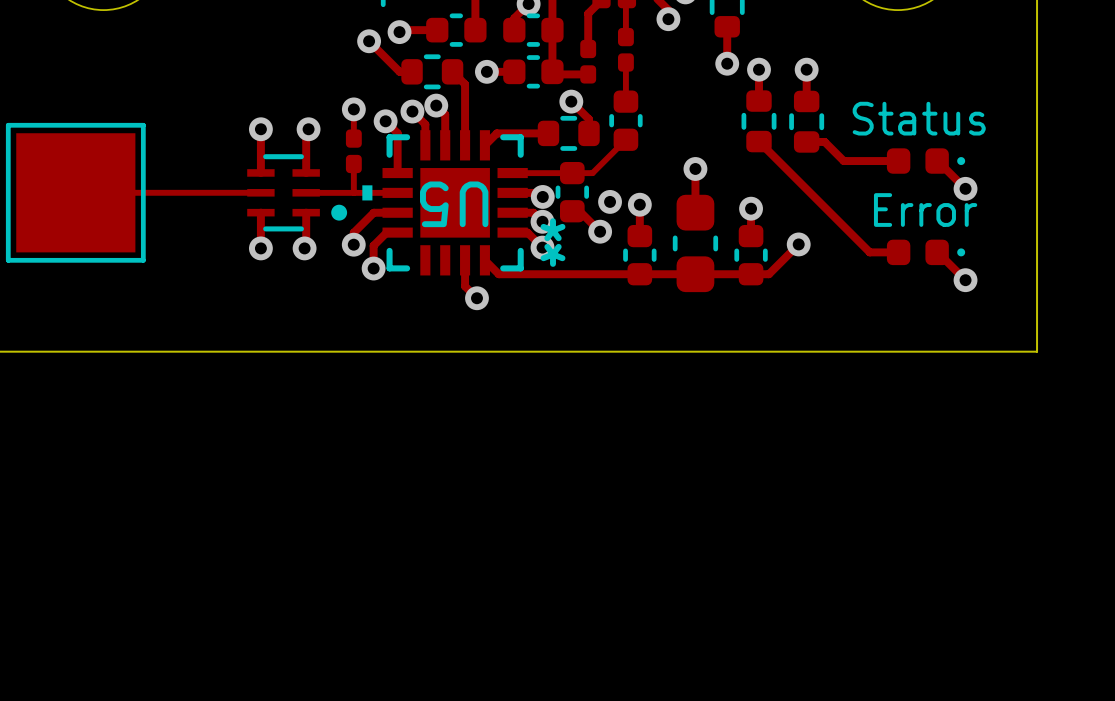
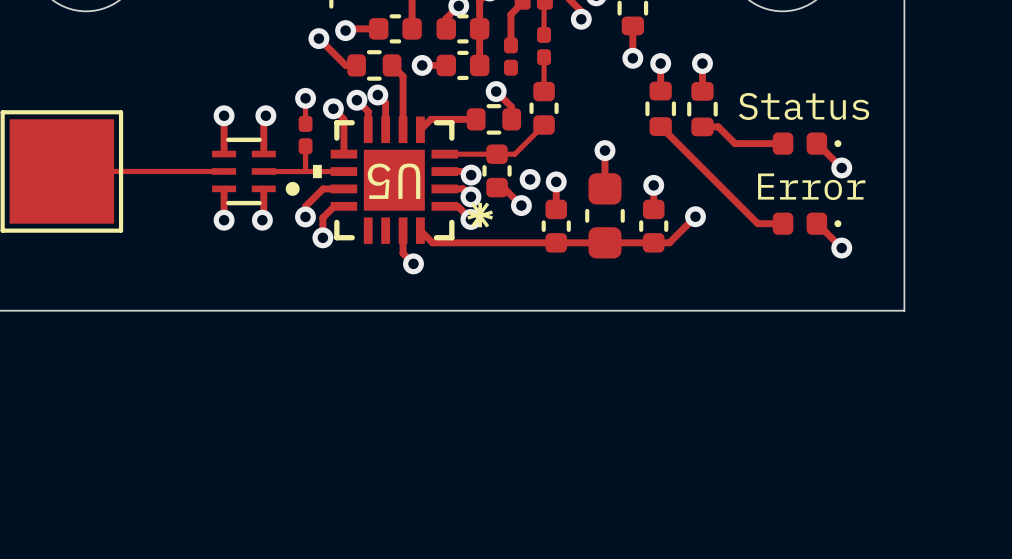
track: (555, 74) (588, 74) -> none

